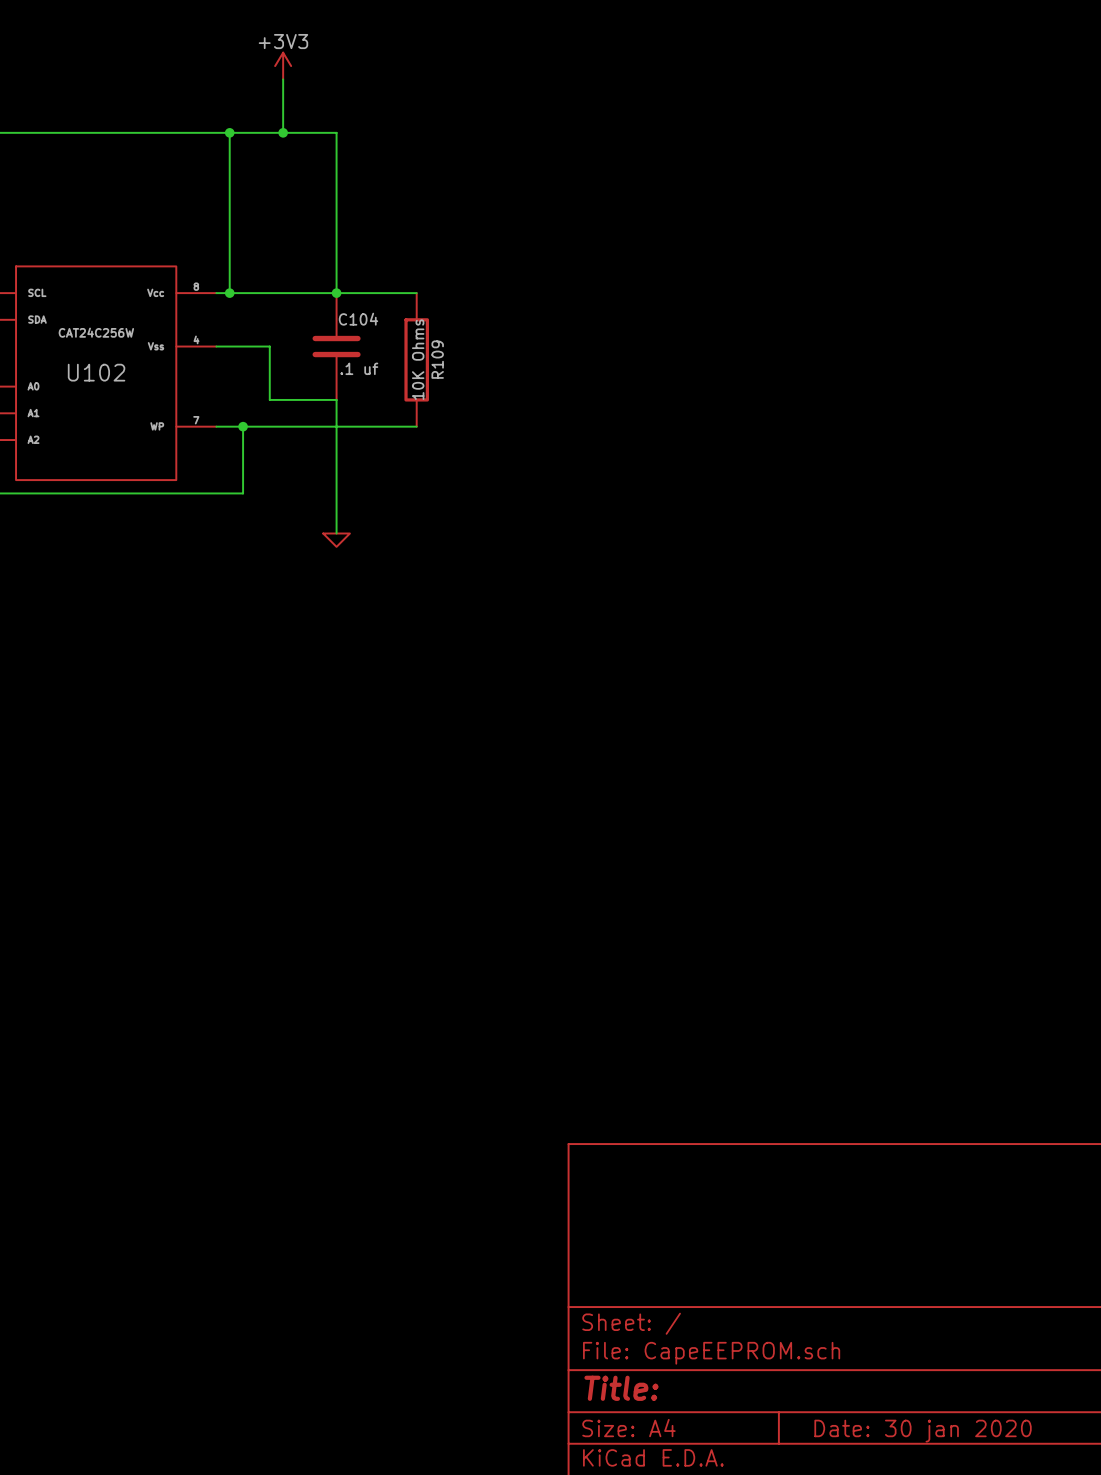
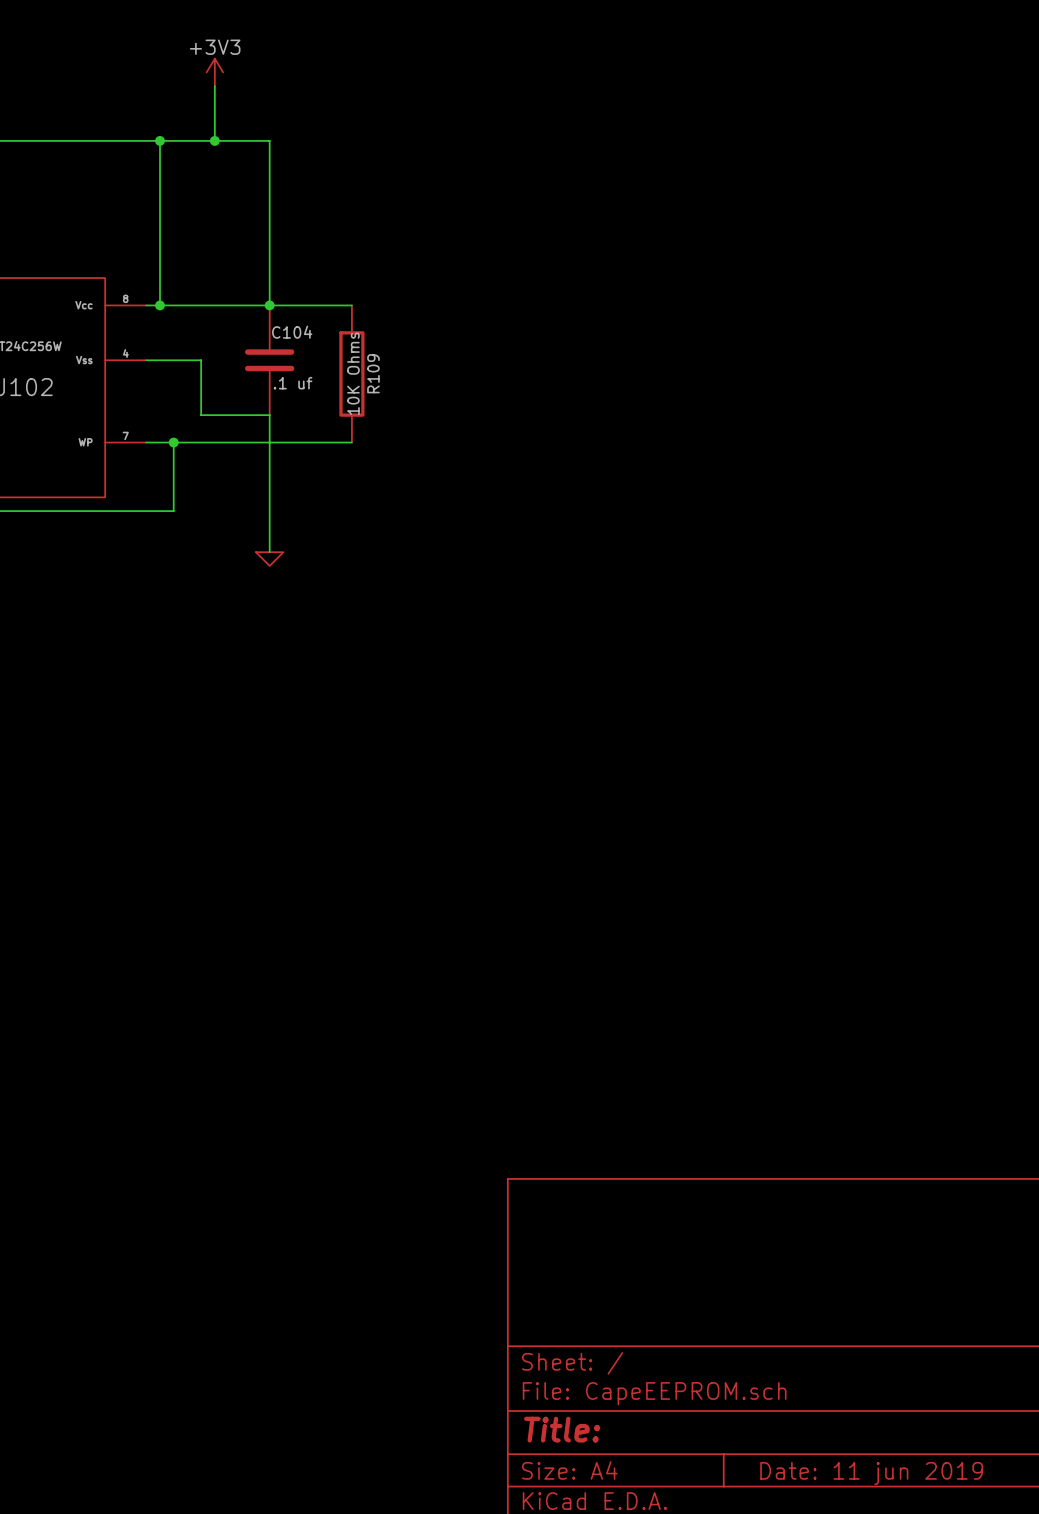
title block: Date: 30 jan 2020 (923, 1431) -> Date: 11 jun 2019 (871, 1473)

